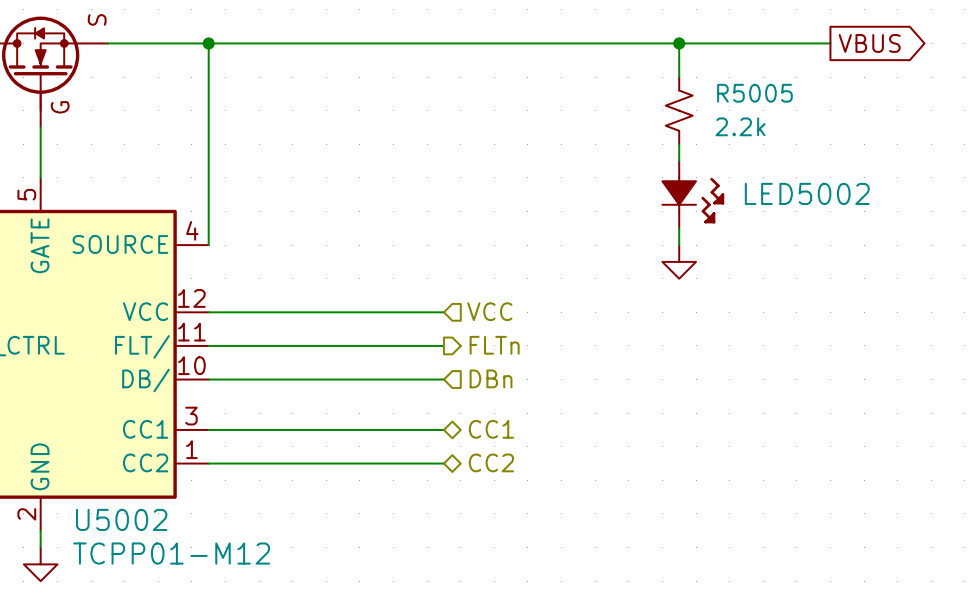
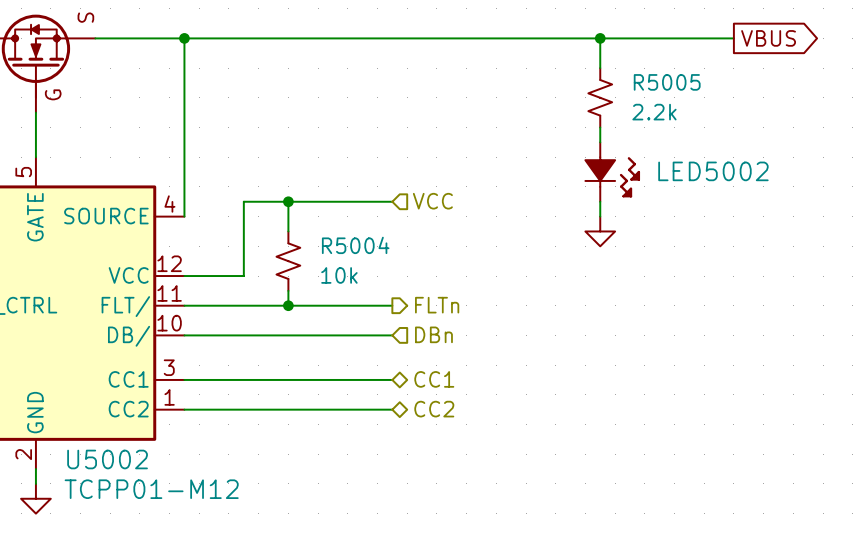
wire: none -> (288, 201) (288, 231)
junction: none -> (288, 201)
R5004: none -> 10k (288, 261)
hierarchical label position: VCC (489, 311) -> VCC (432, 201)
wire: (275, 312) (443, 312) -> (243, 276) (243, 201) (392, 201)
wire: none -> (288, 290) (288, 305)
junction: none -> (288, 305)

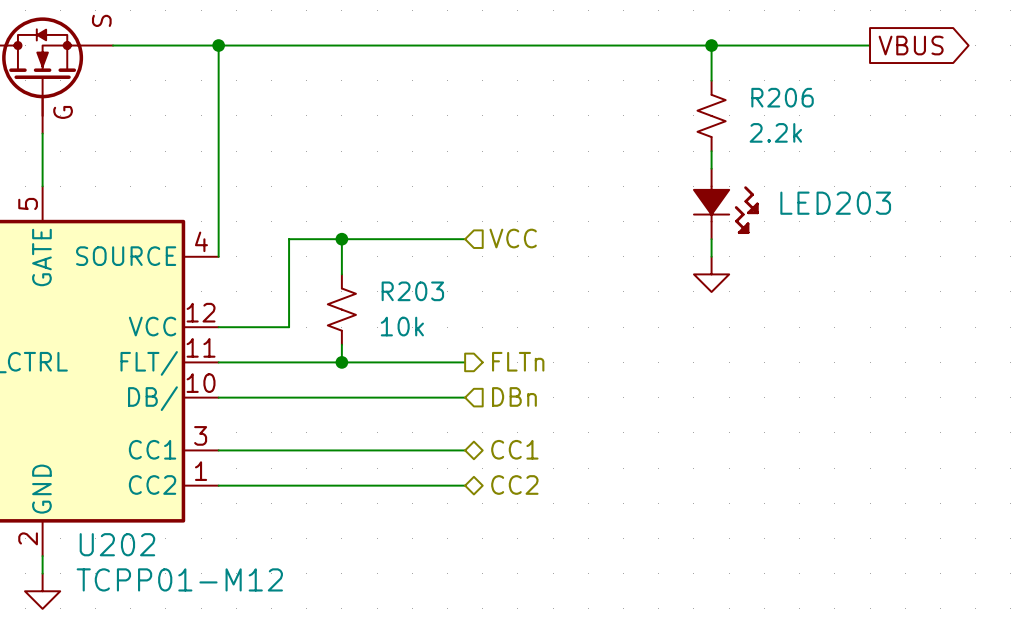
R5005 name: R5005 (667, 82) -> R206 (782, 97)
LED5002 name: LED5002 (713, 171) -> LED203 (835, 203)
R5004 name: R5004 (355, 245) -> R203 (412, 291)
U5002 name: U5002 (107, 459) -> U202 (117, 544)

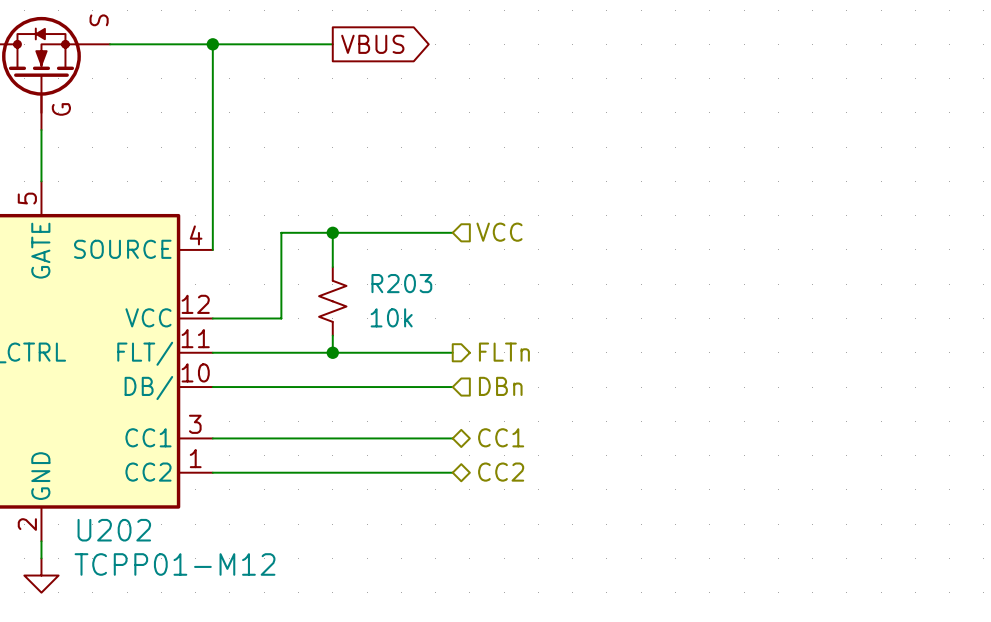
wire: (341, 45) (870, 45) -> none
global label: none -> VBUS (372, 44)
wire: (711, 45) (711, 80) -> none
junction: (711, 45) -> none
global label: VBUS (911, 45) -> none
R206: 2.2k (711, 115) -> none
wire: (711, 151) (711, 168) -> none
LED203: (726, 203) -> none
wire: (711, 239) (711, 256) -> none
power symbol: (711, 274) -> none

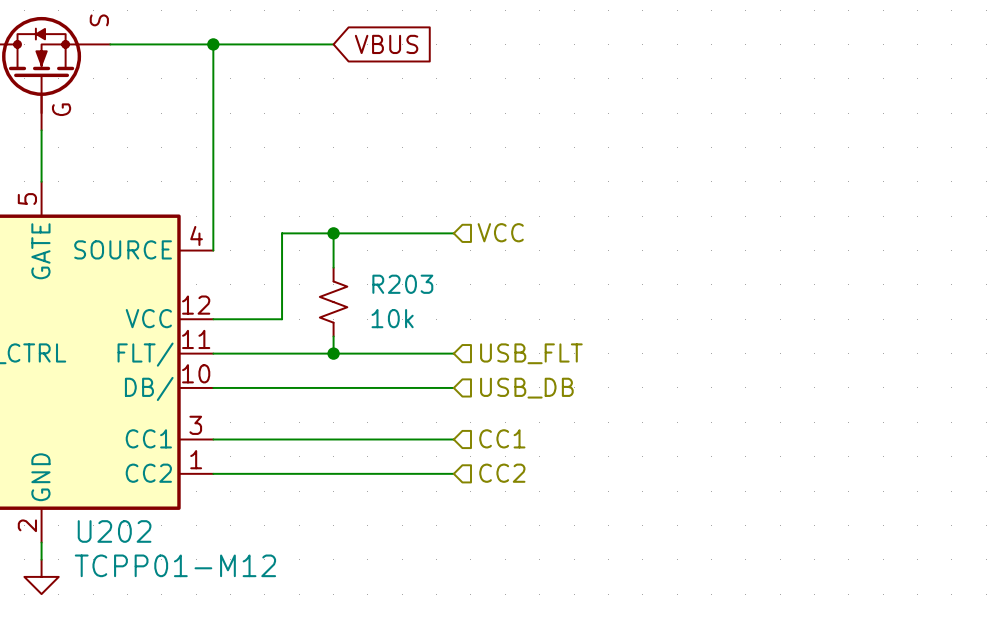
global label shape: output (372, 44) -> input (386, 44)
hierarchical label shape: output (504, 352) -> input (531, 353)
hierarchical label: FLTn (504, 352) -> USB_FLT (531, 353)
hierarchical label: DBn (500, 386) -> USB_DB (526, 388)
hierarchical label shape: bidirectional (501, 437) -> input (502, 438)
hierarchical label shape: bidirectional (501, 472) -> input (502, 473)

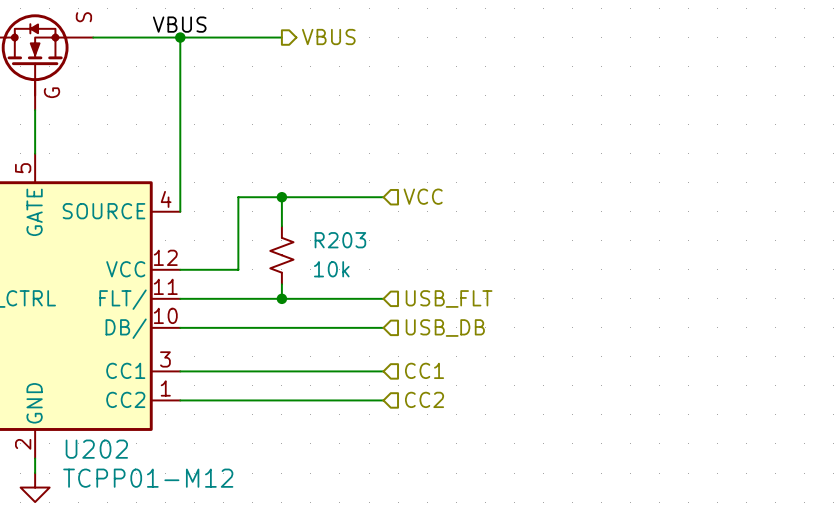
label: none -> VBUS (179, 24)
hierarchical label: none -> VBUS (328, 37)
global label: VBUS (386, 44) -> none

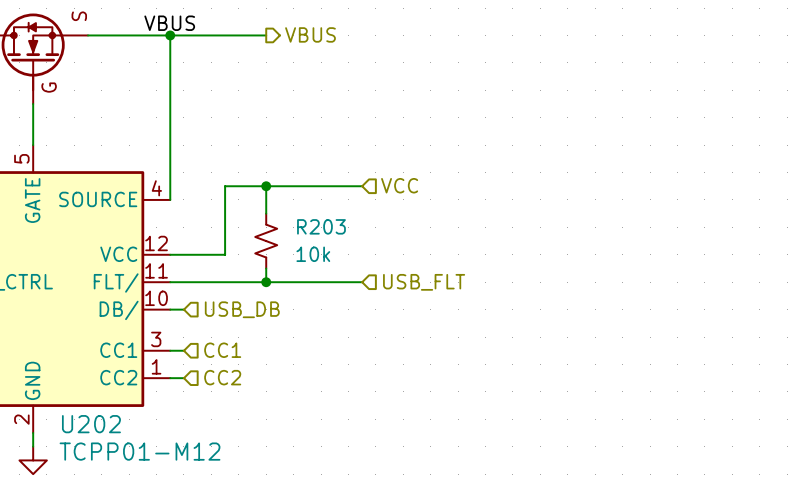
wire: (194, 327) (383, 327) -> none
hierarchical label position: USB_DB (445, 328) -> USB_DB (242, 309)
hierarchical label position: CC1 (424, 370) -> CC1 (222, 350)
wire: (194, 371) (383, 371) -> none
hierarchical label position: CC2 (424, 399) -> CC2 (222, 377)
wire: (194, 400) (383, 400) -> none

